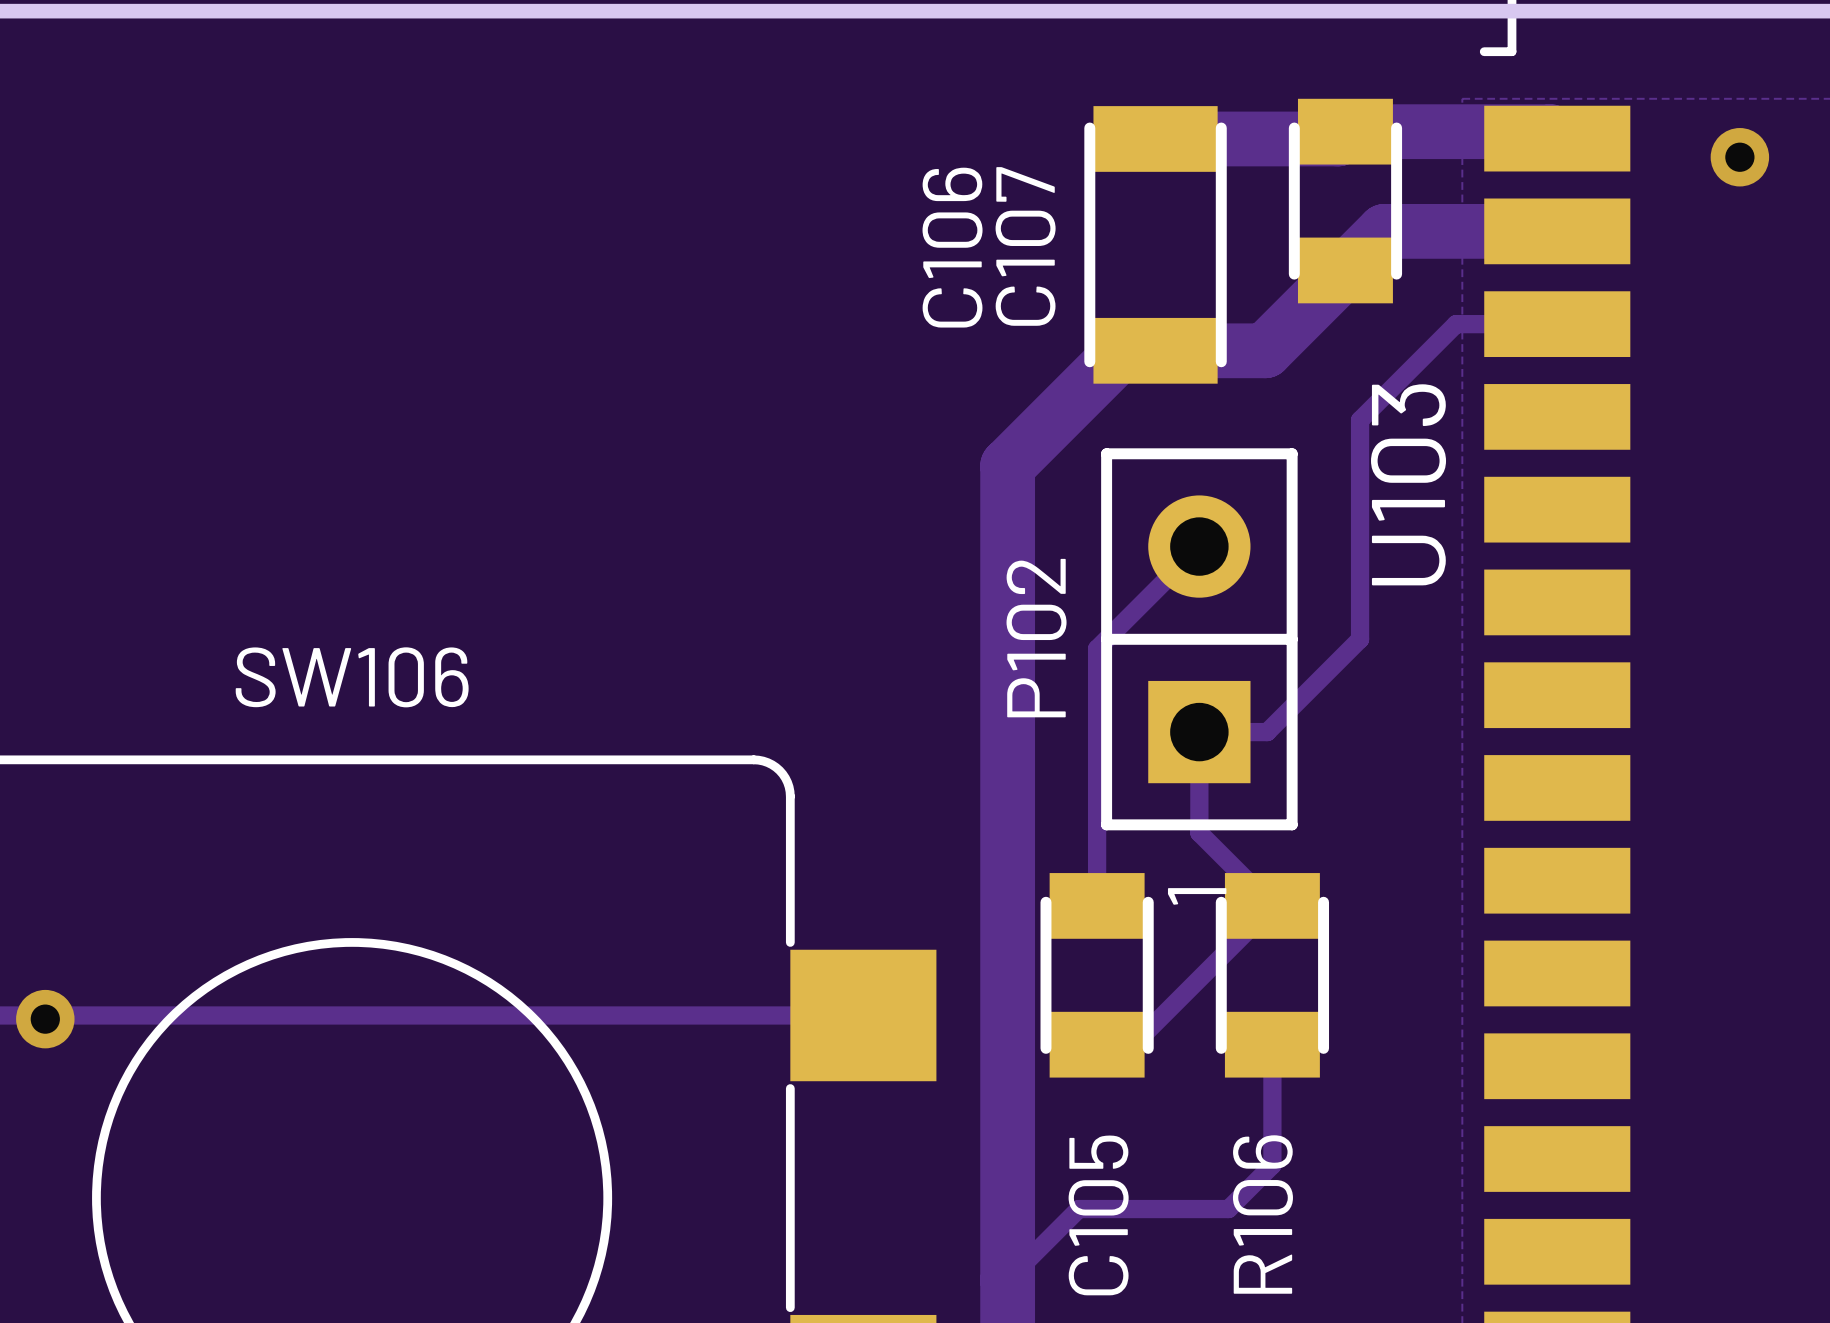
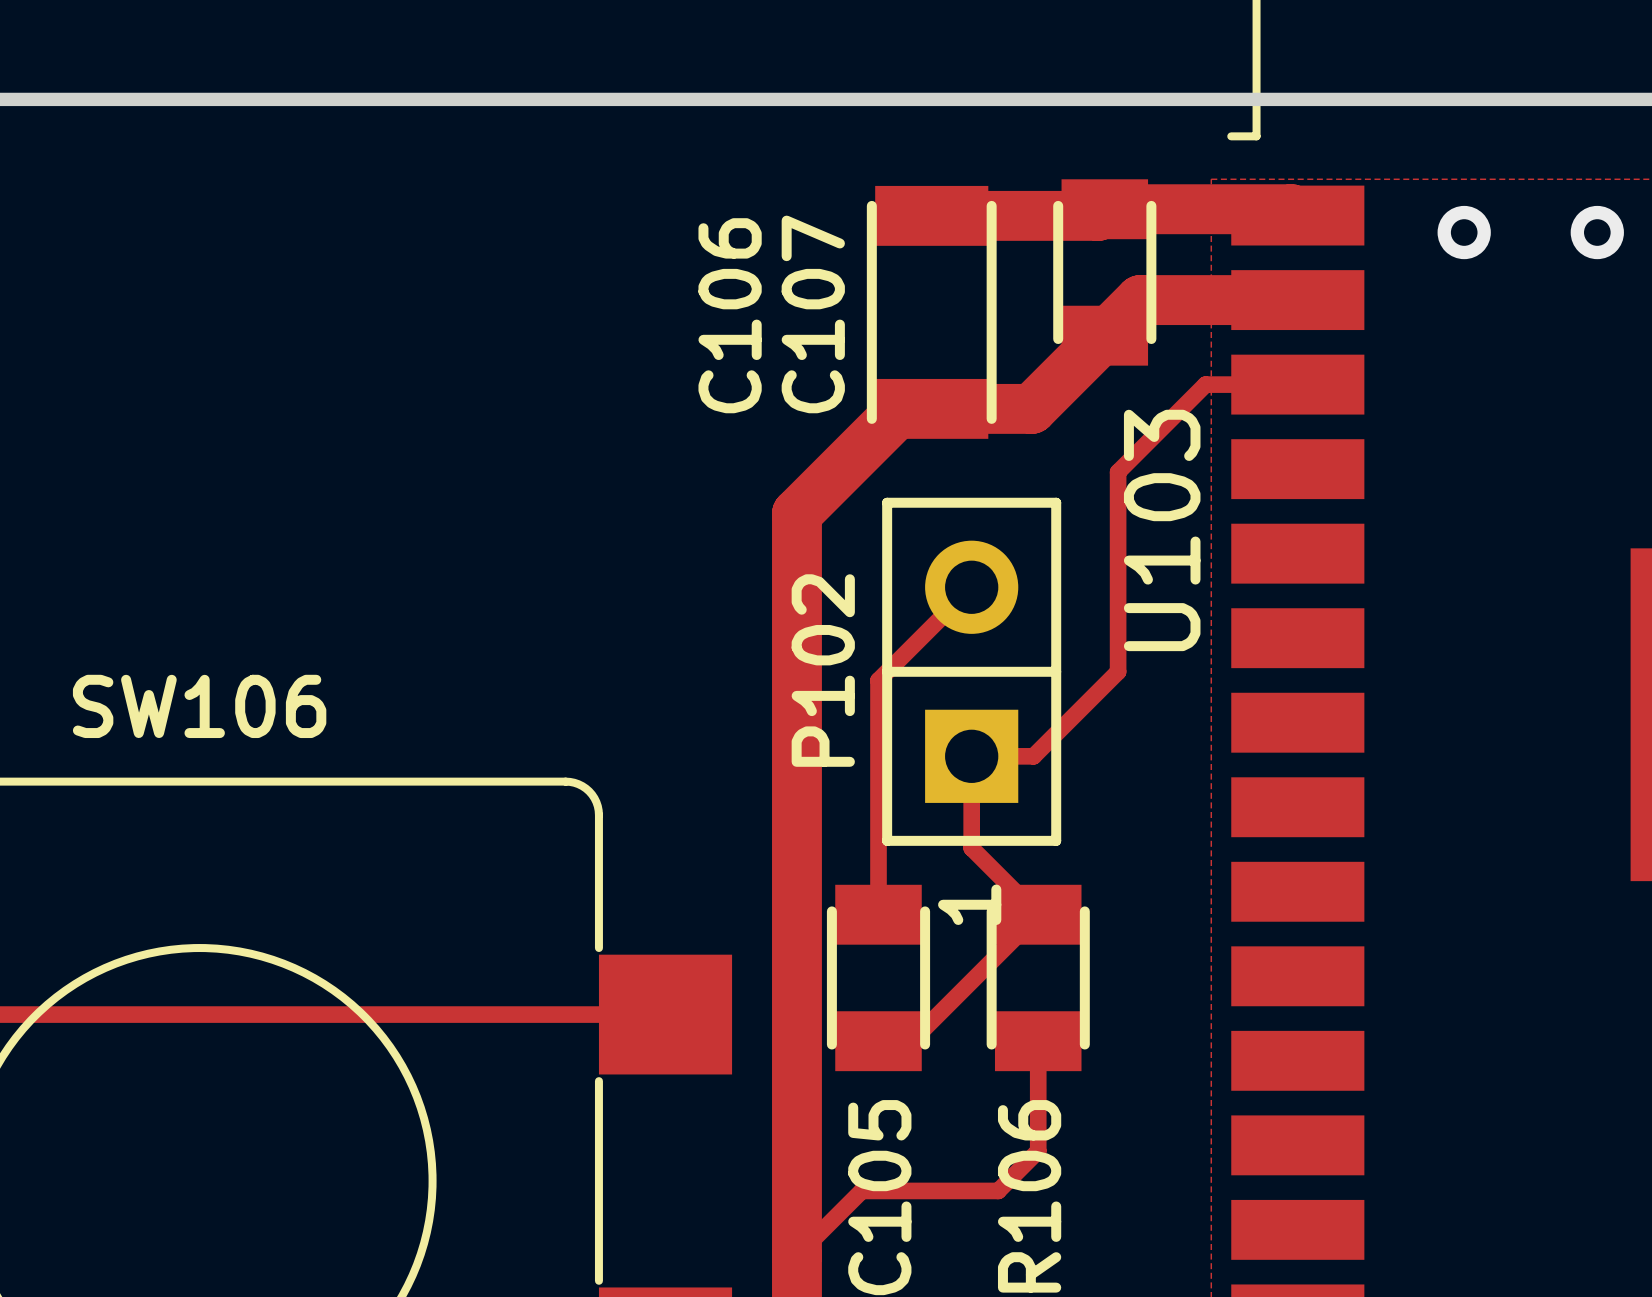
C106 name position: C106 (952, 247) -> C106 (730, 315)

